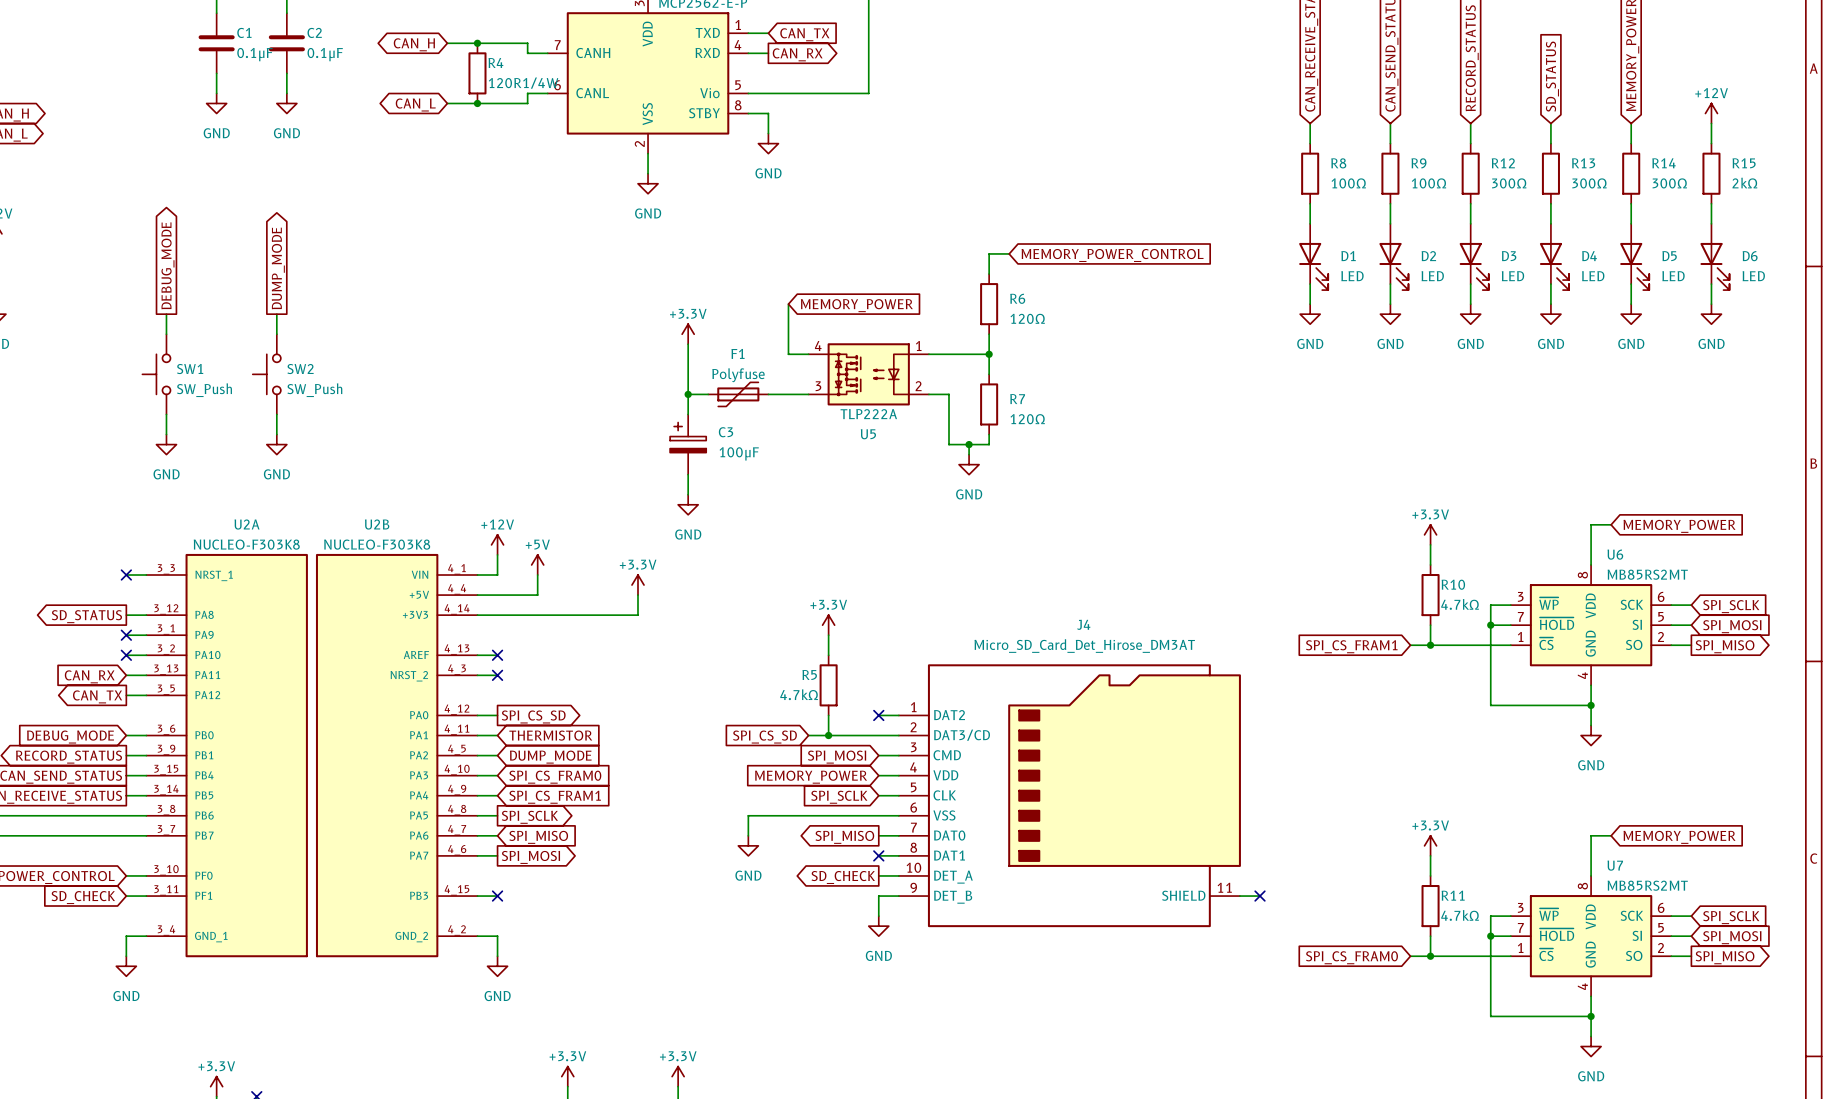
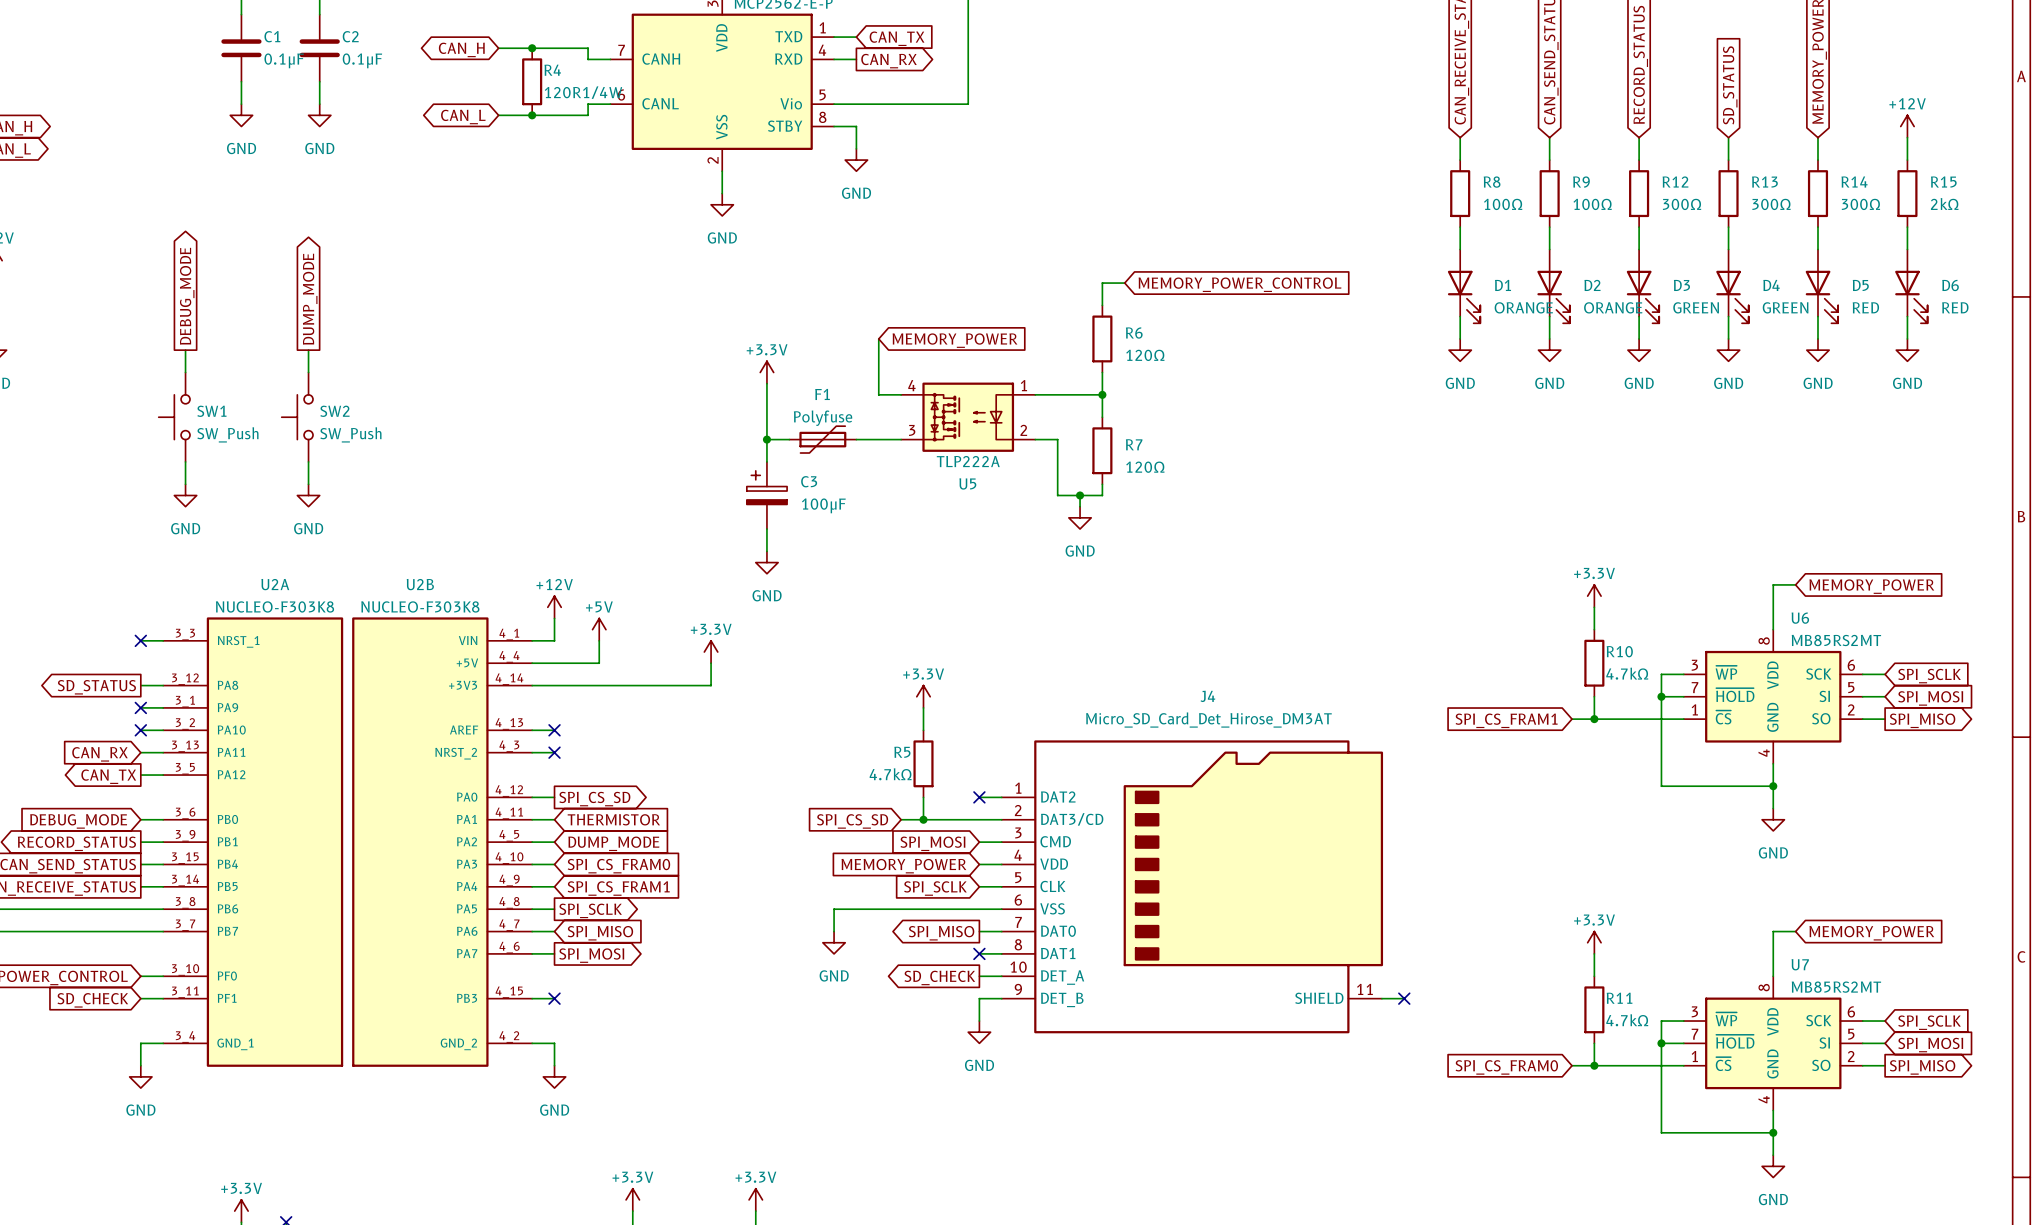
D1 value: LED (1352, 276) -> ORANGE (1523, 307)
D2 value: LED (1432, 276) -> ORANGE (1613, 307)
D3 value: LED (1512, 276) -> GREEN (1696, 307)
D4 value: LED (1593, 276) -> GREEN (1785, 307)
D5 value: LED (1673, 276) -> RED (1865, 307)
D6 value: LED (1753, 276) -> RED (1955, 307)

